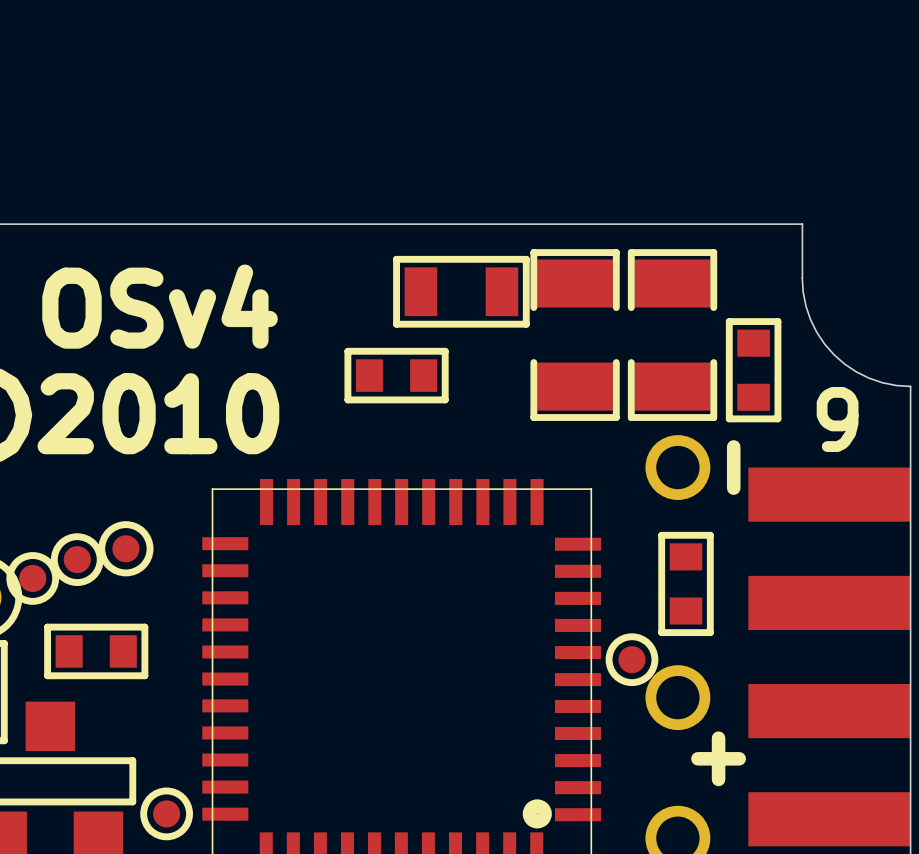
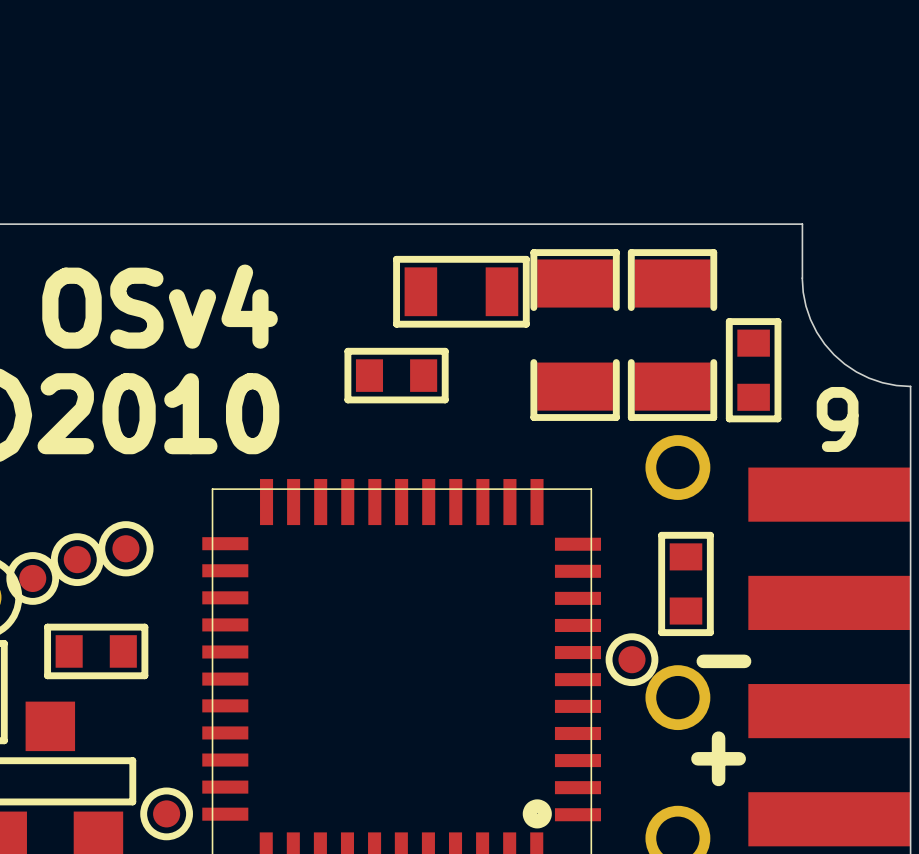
text rotation: 0° (733, 467) -> 90° clockwise (723, 661)
text position: - (733, 467) -> - (723, 661)

